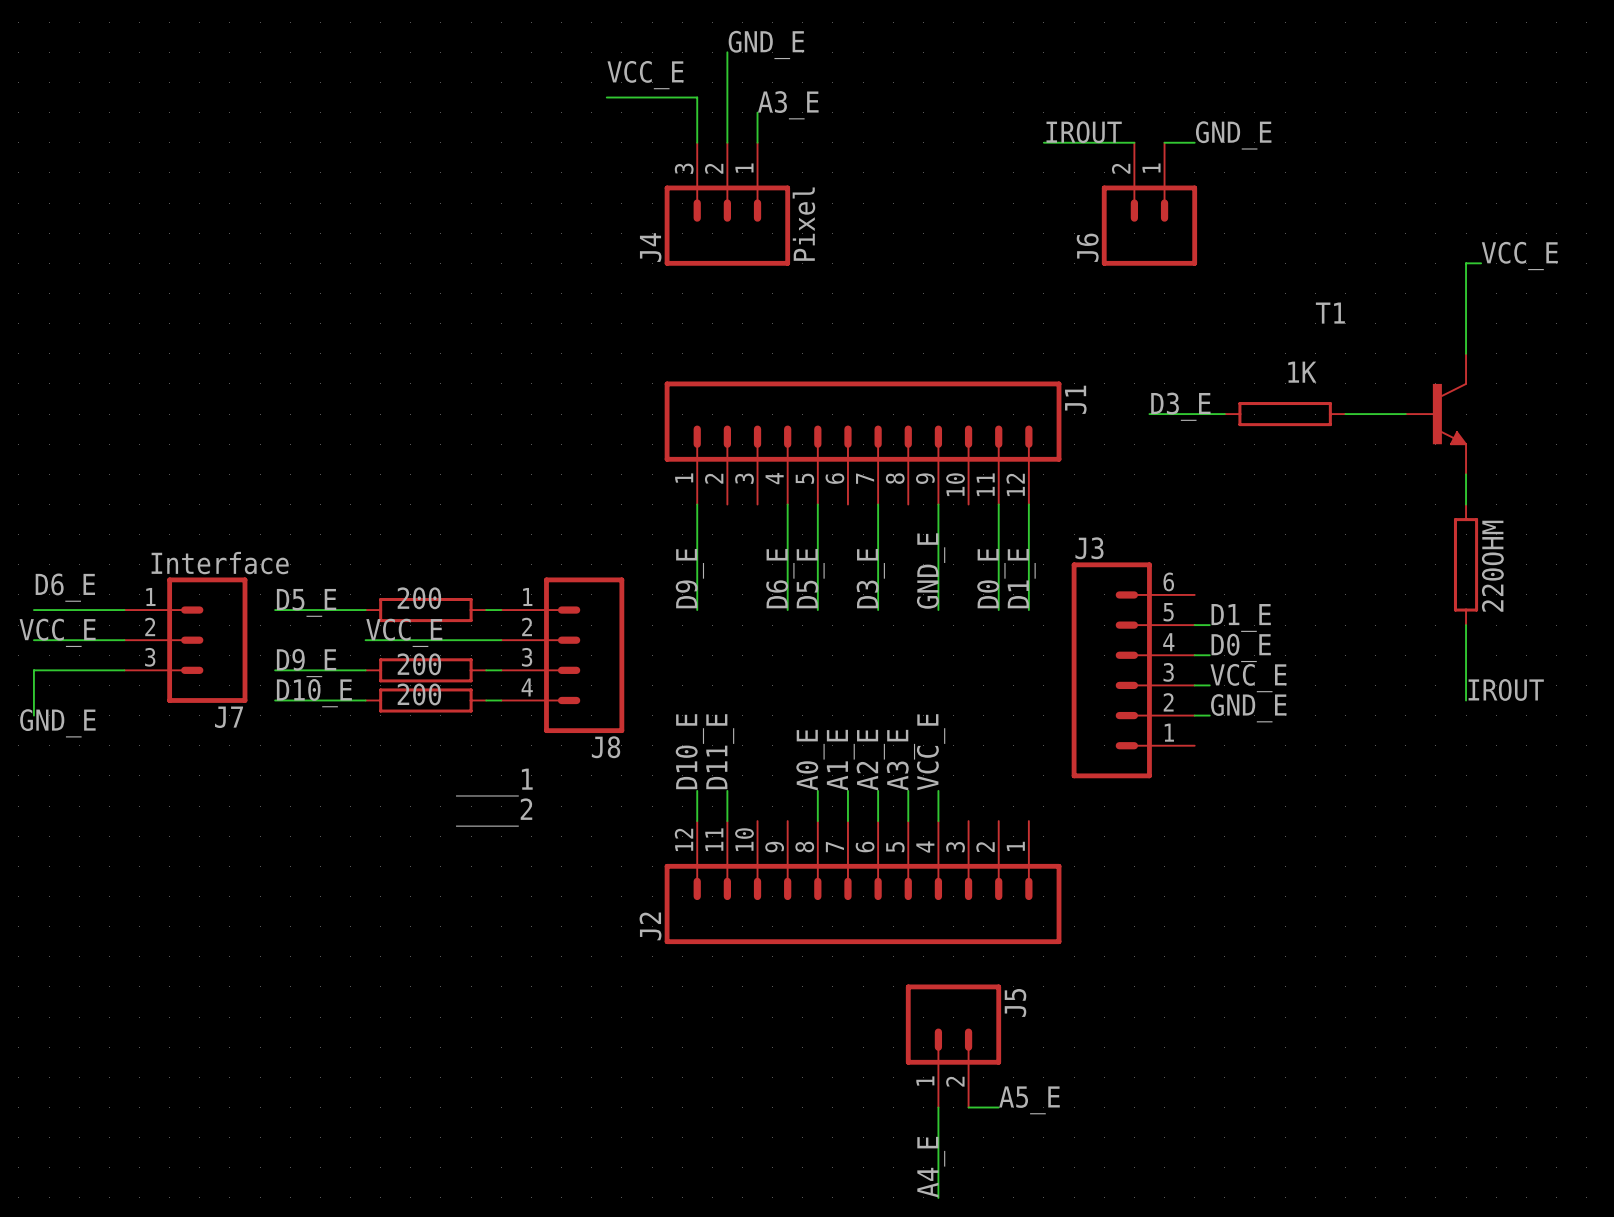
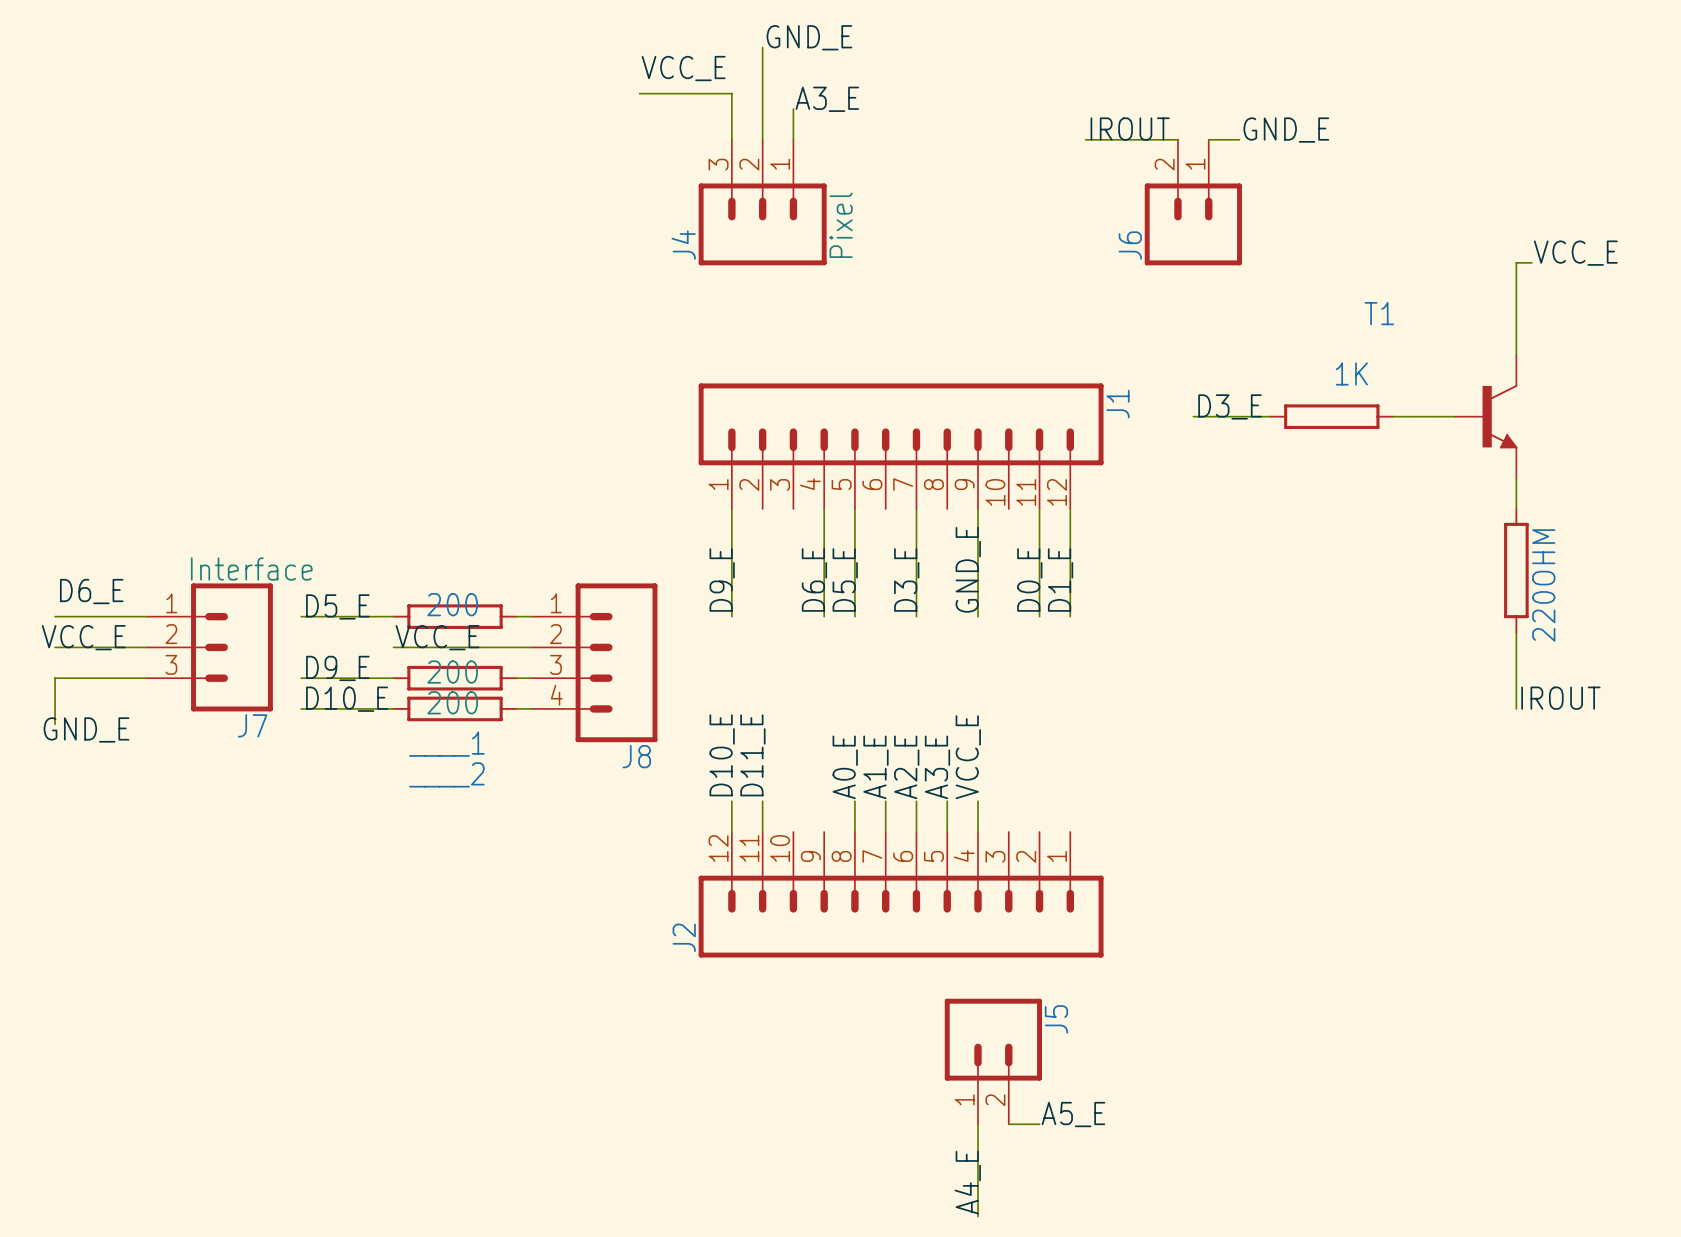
label: D1_E (1241, 617) -> none
wire: (1194, 625) (1209, 625) -> none
label: D0_E (1241, 647) -> none
wire: (1194, 655) (1209, 655) -> none
J3: (1133, 670) -> none
label: VCC_E (1248, 678) -> none
wire: (1194, 685) (1209, 685) -> none
label: GND_E (1248, 708) -> none
wire: (1194, 715) (1209, 715) -> none
____1 name position: ____1 (494, 782) -> ____1 (446, 744)
____2 name position: ____2 (494, 812) -> ____2 (446, 774)

